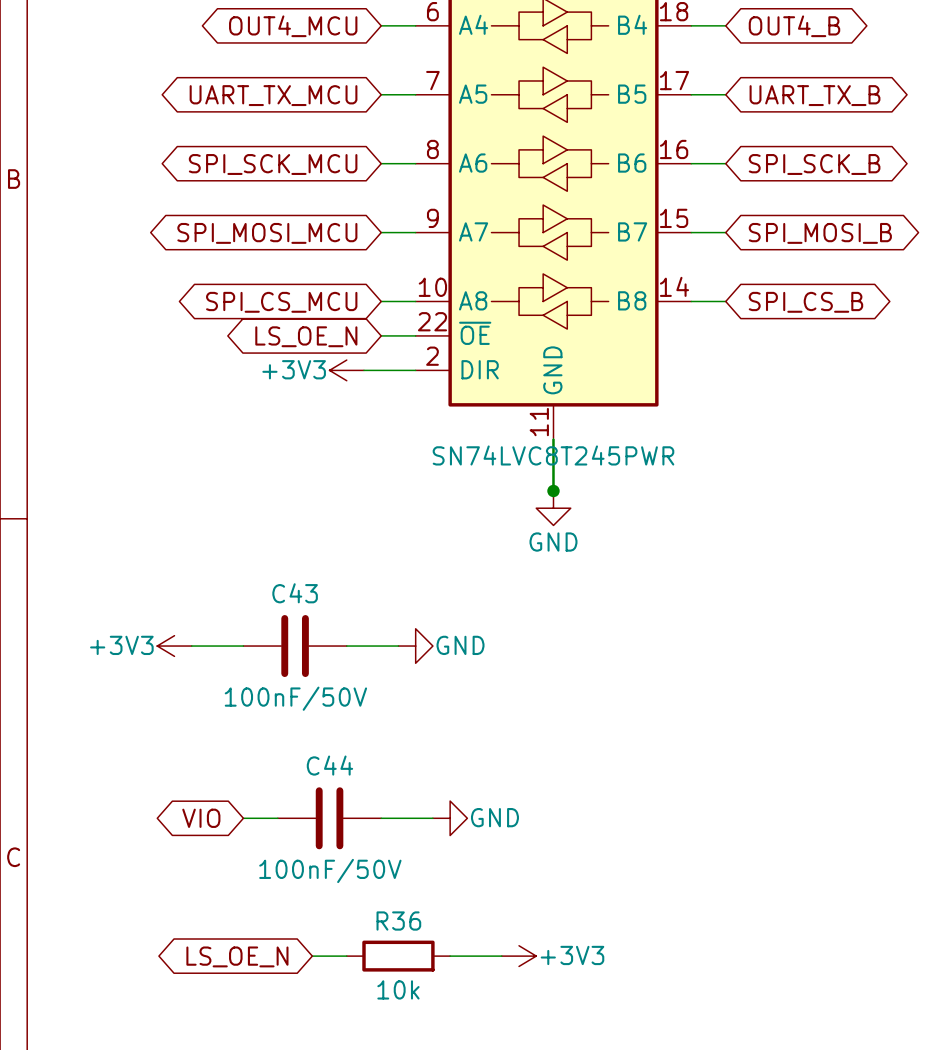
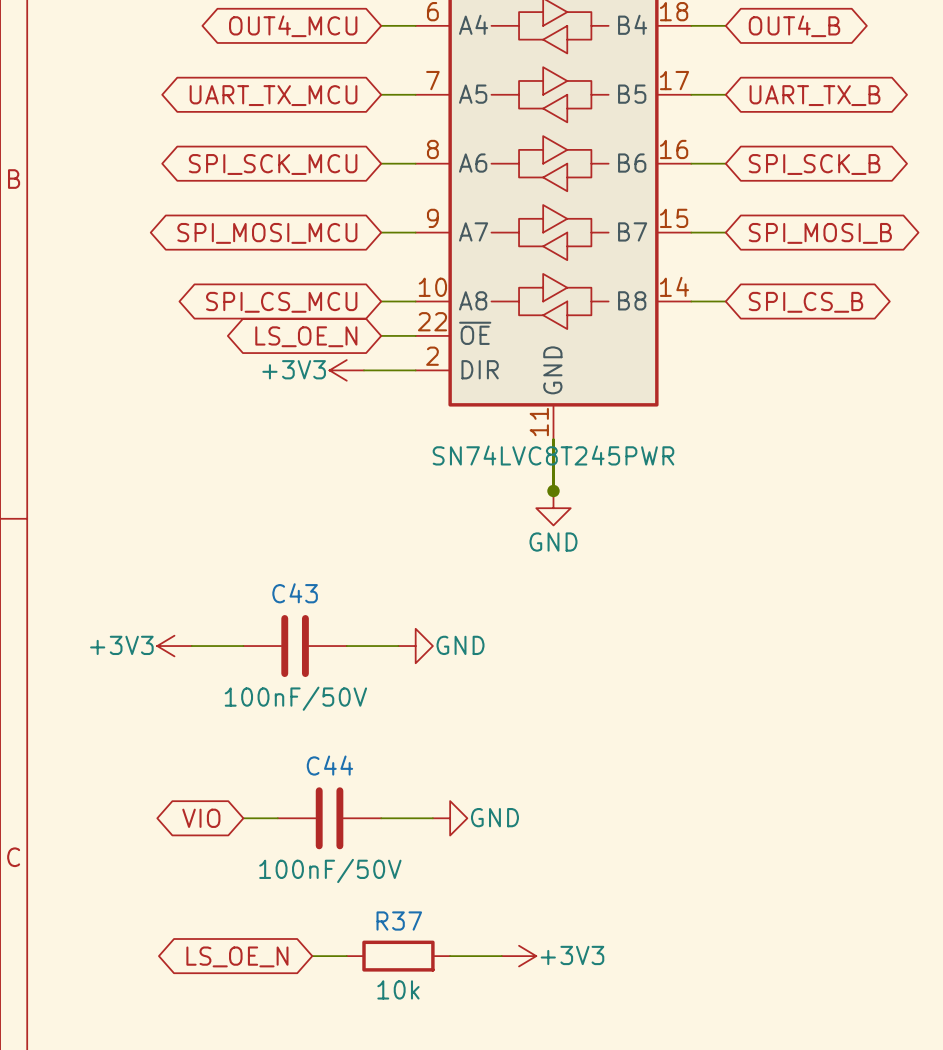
R36 name: R36 (398, 921) -> R37 (399, 921)

